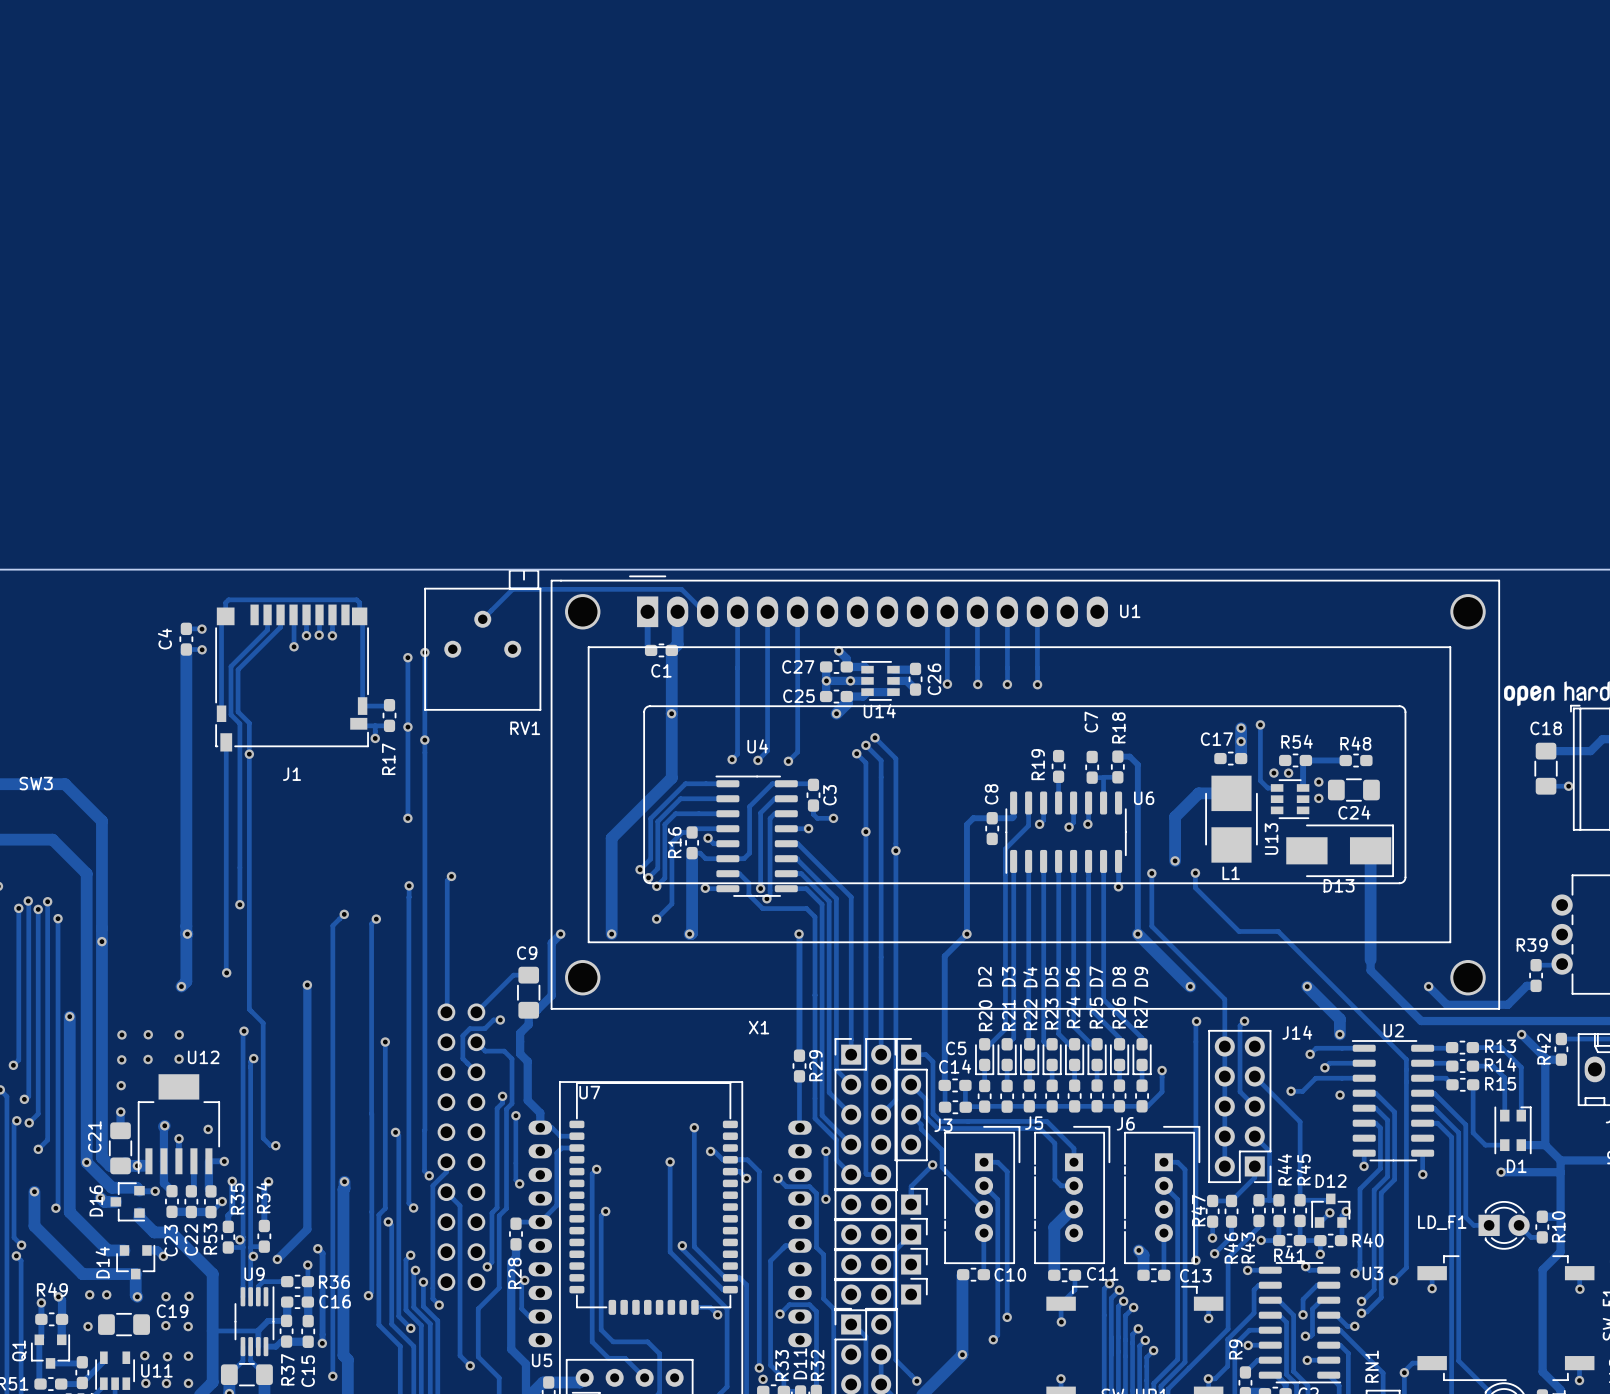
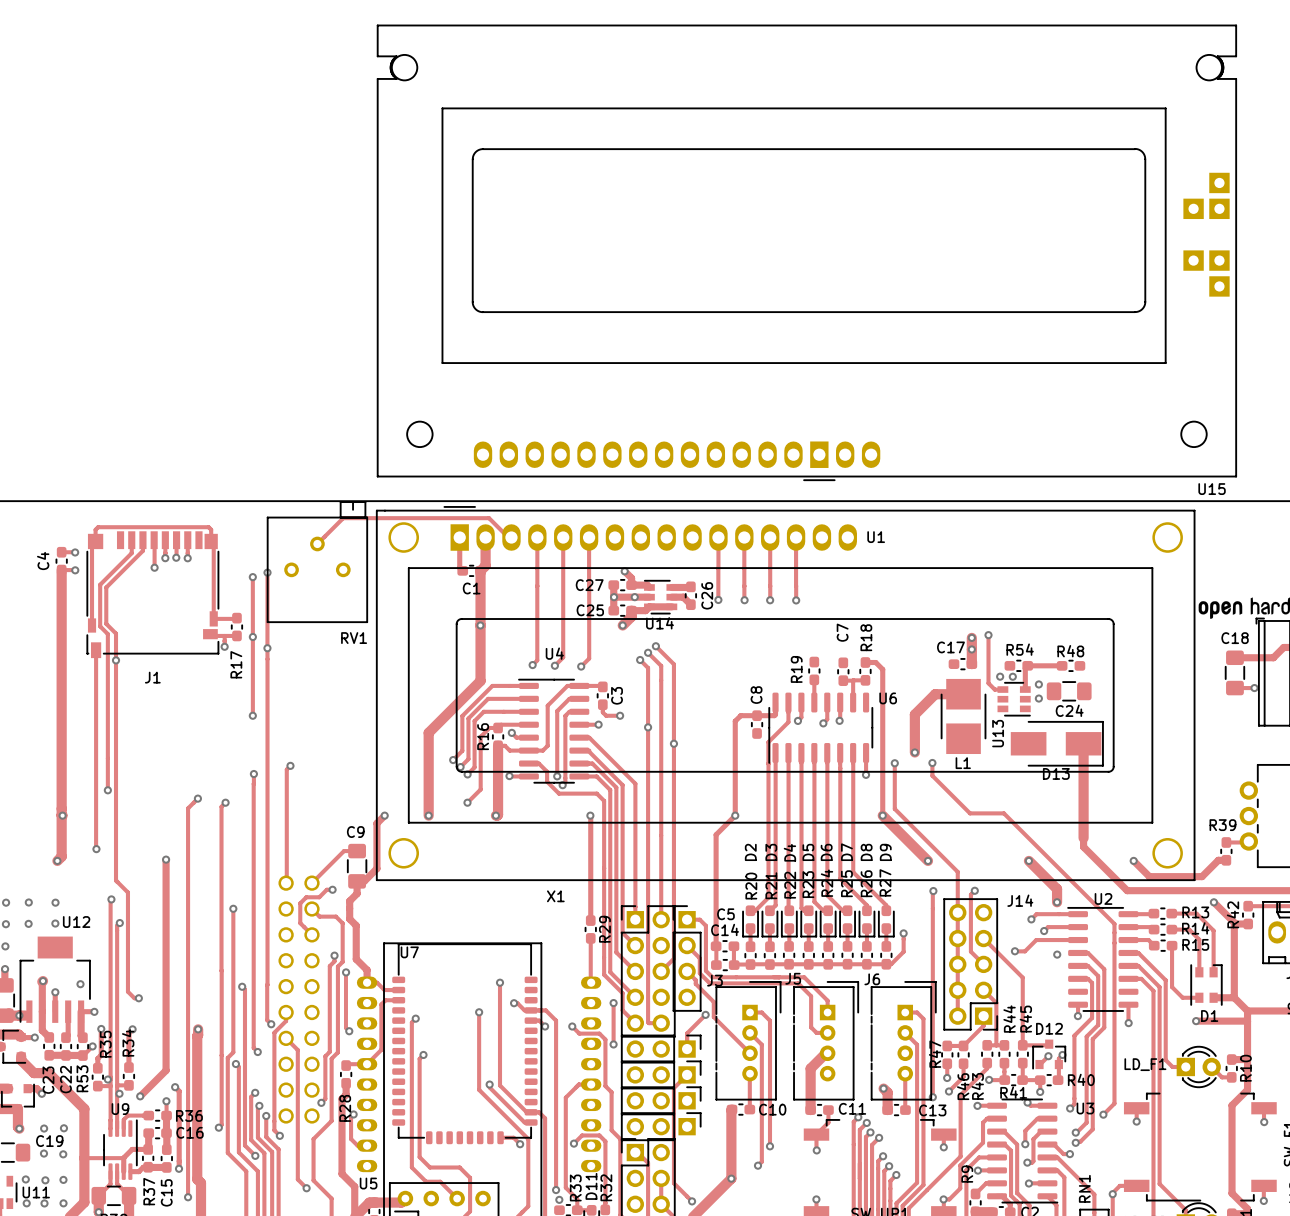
U15: none -> (806, 252)

